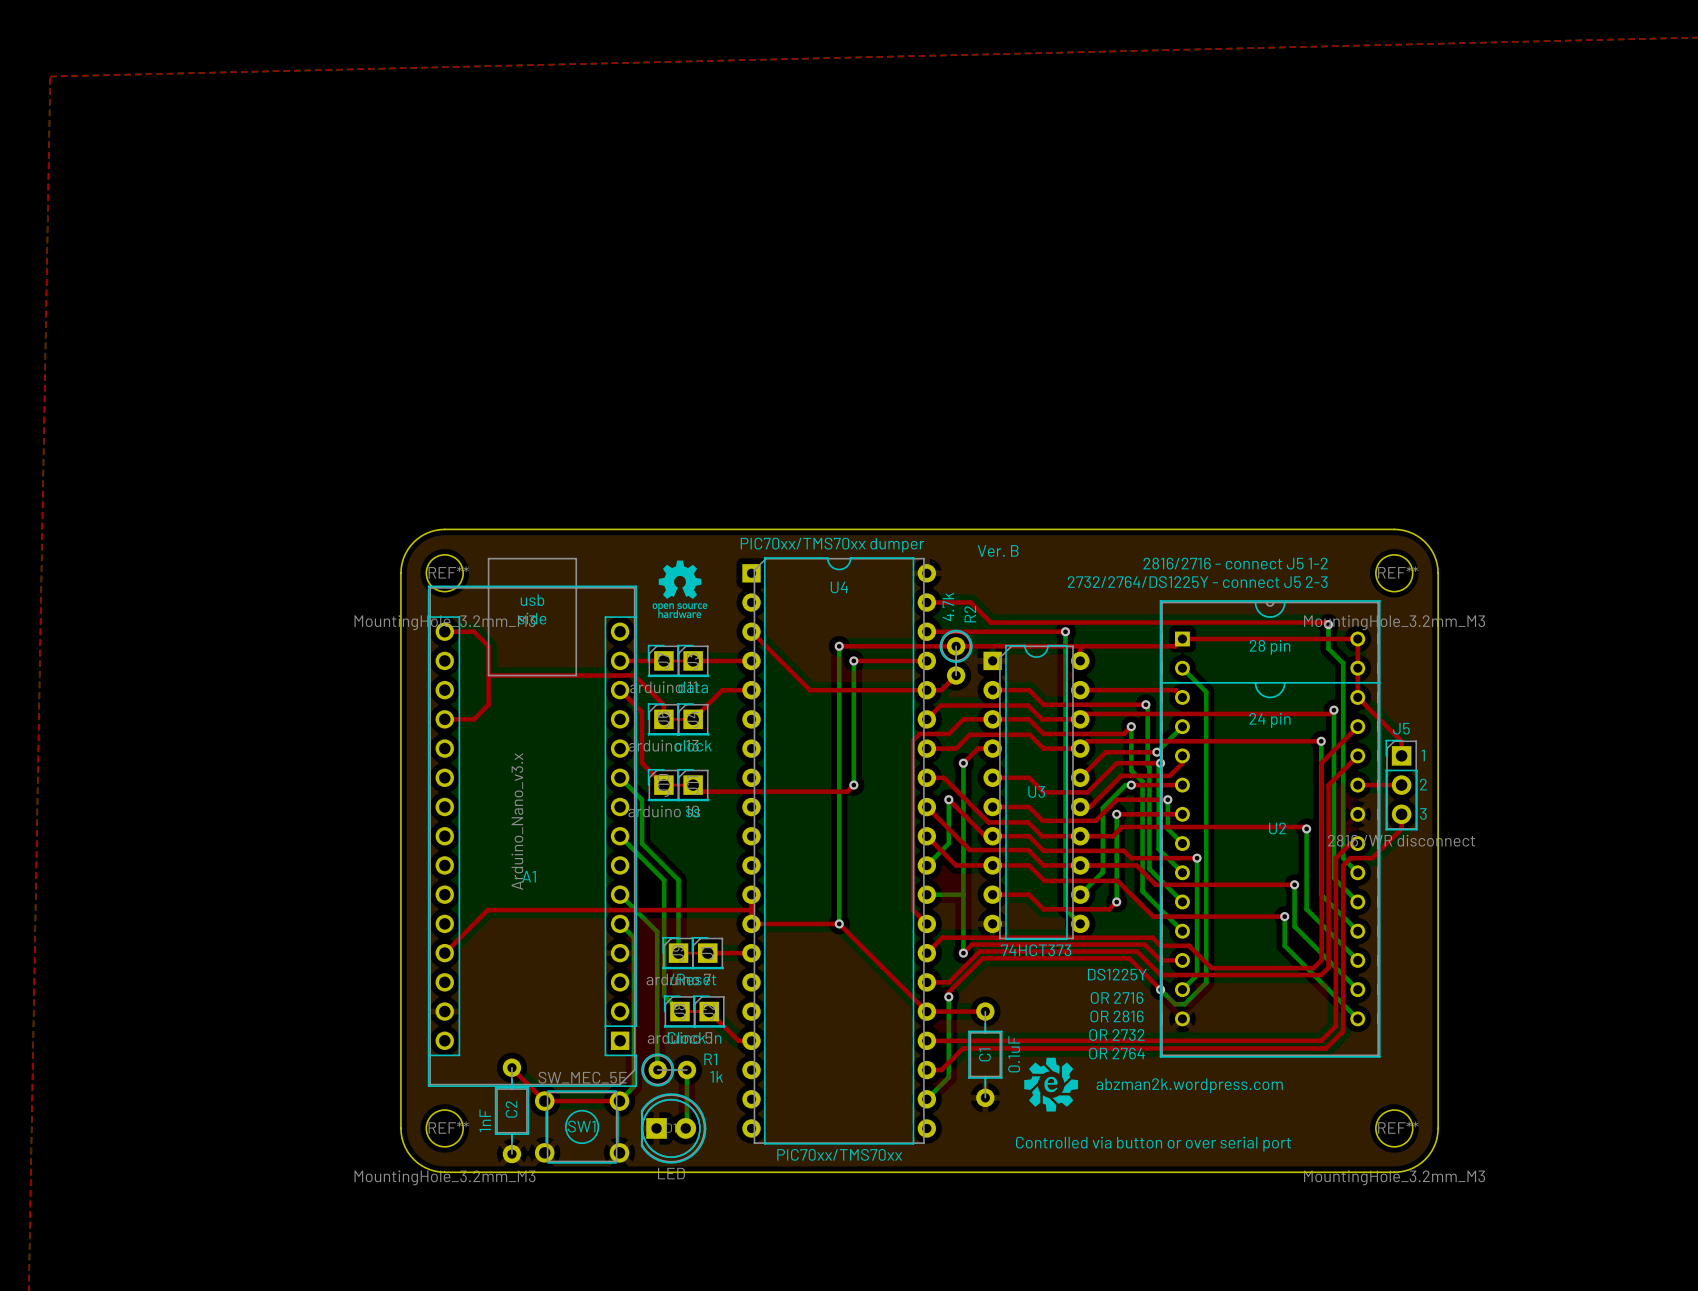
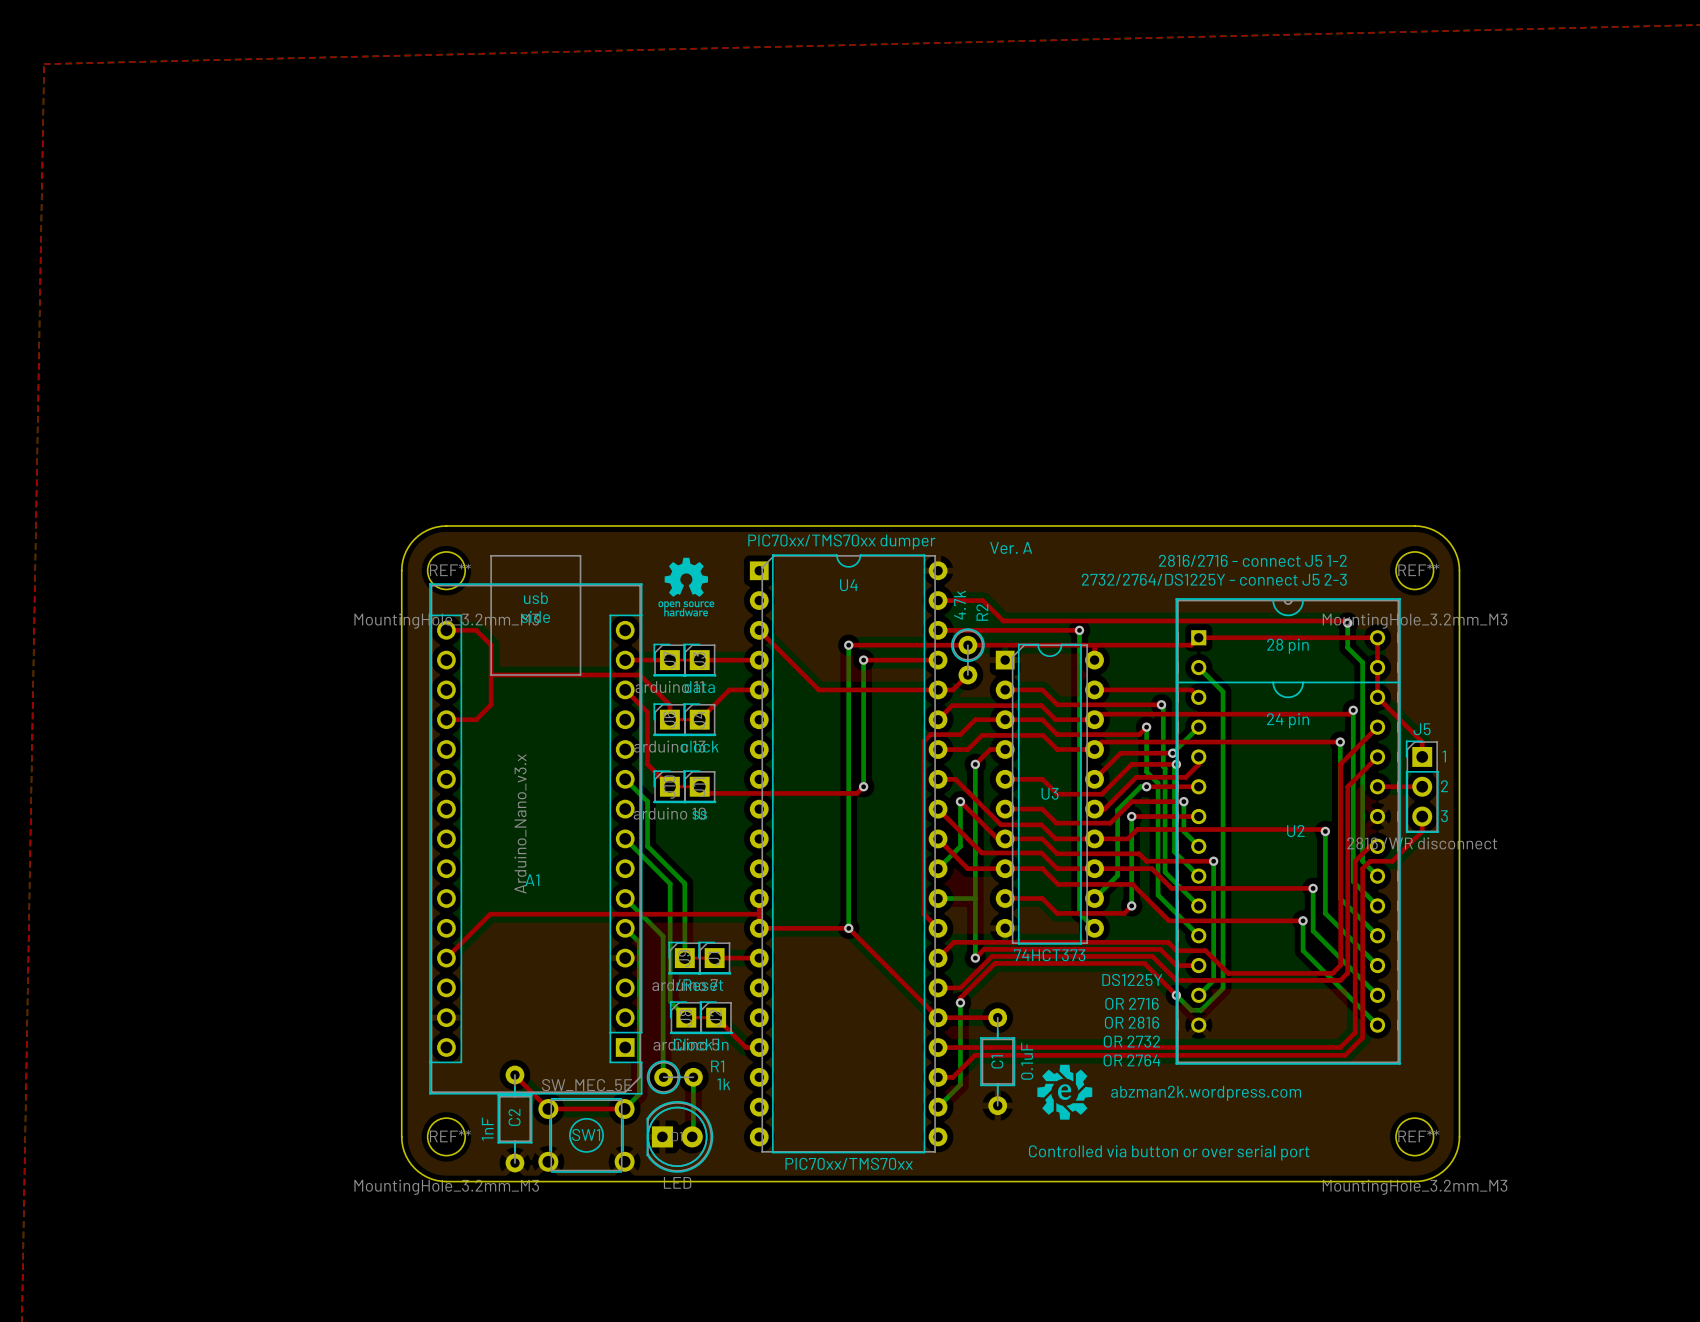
text: Ver. B (998, 550) -> Ver. A (1011, 547)

